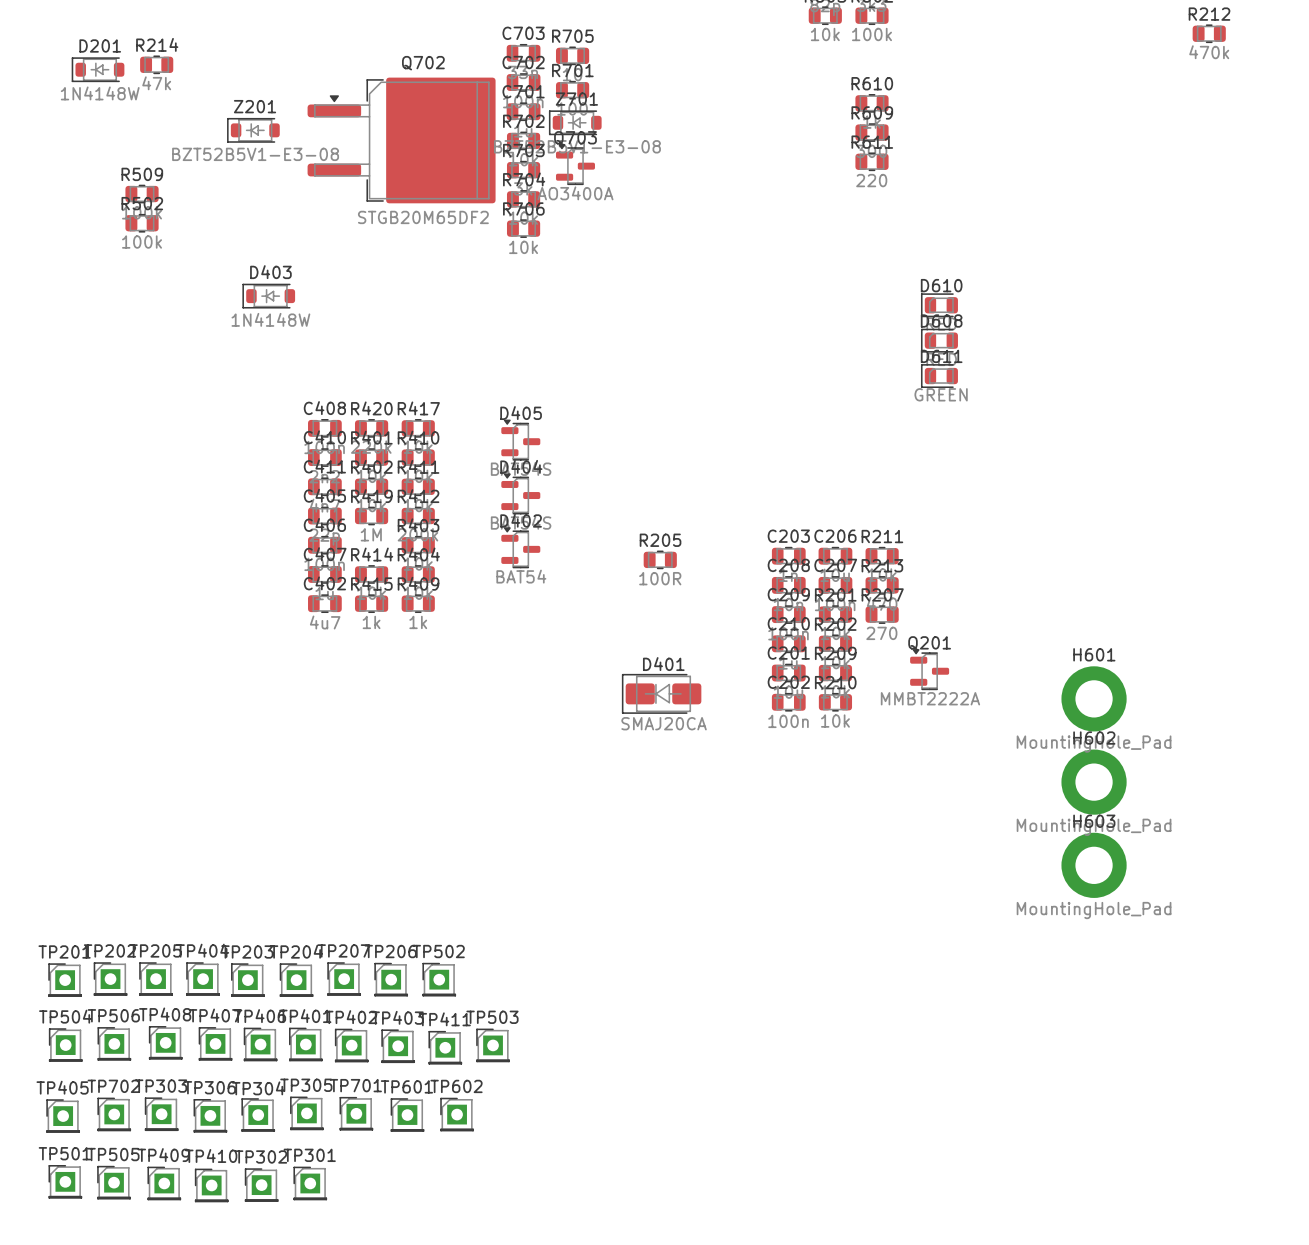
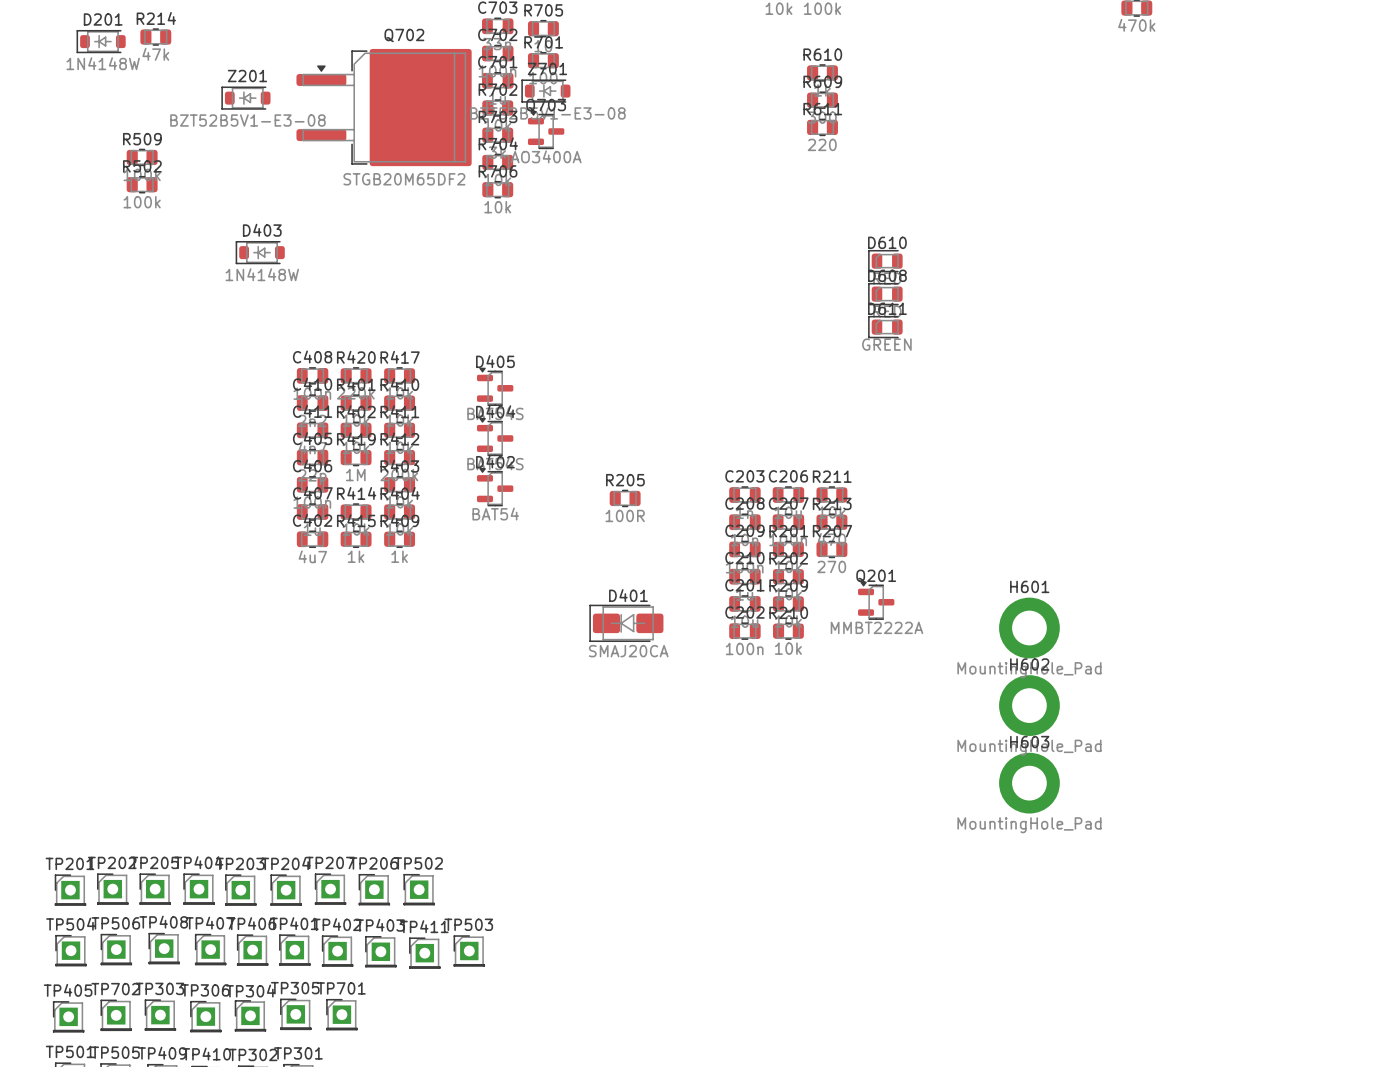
TP602: (457, 1114) -> none
TP601: (407, 1115) -> none

